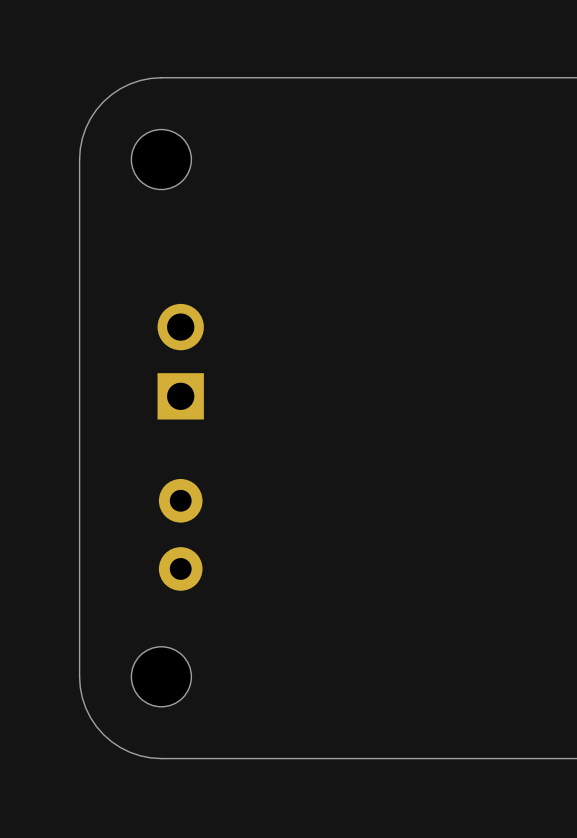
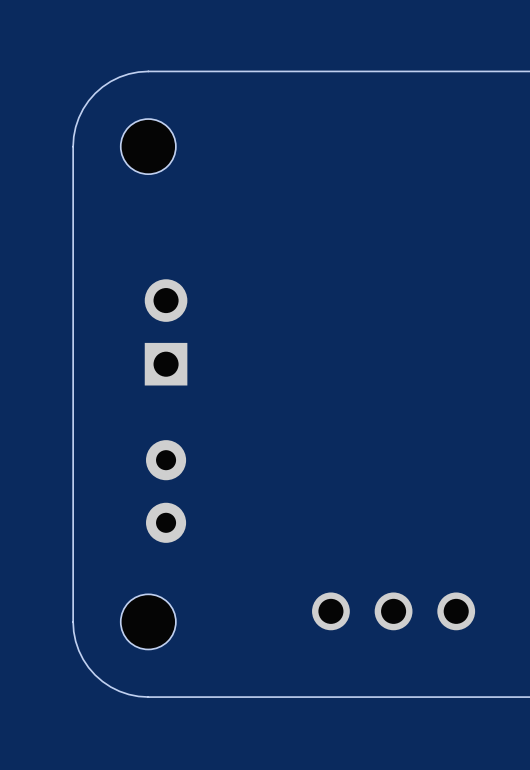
part: none -> (393, 611)

